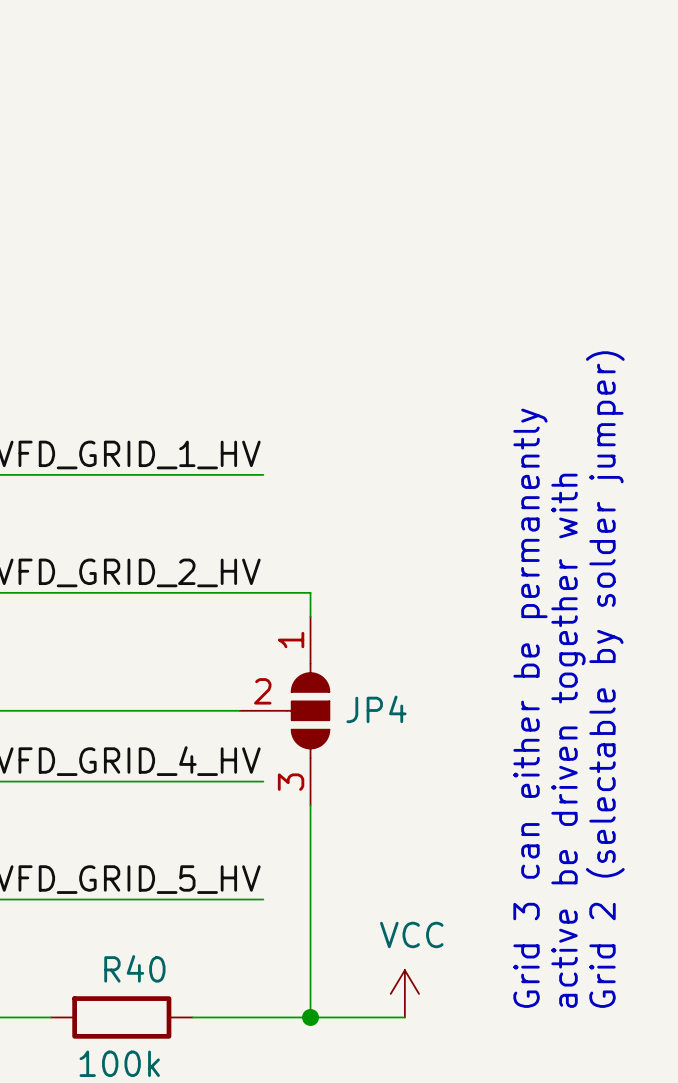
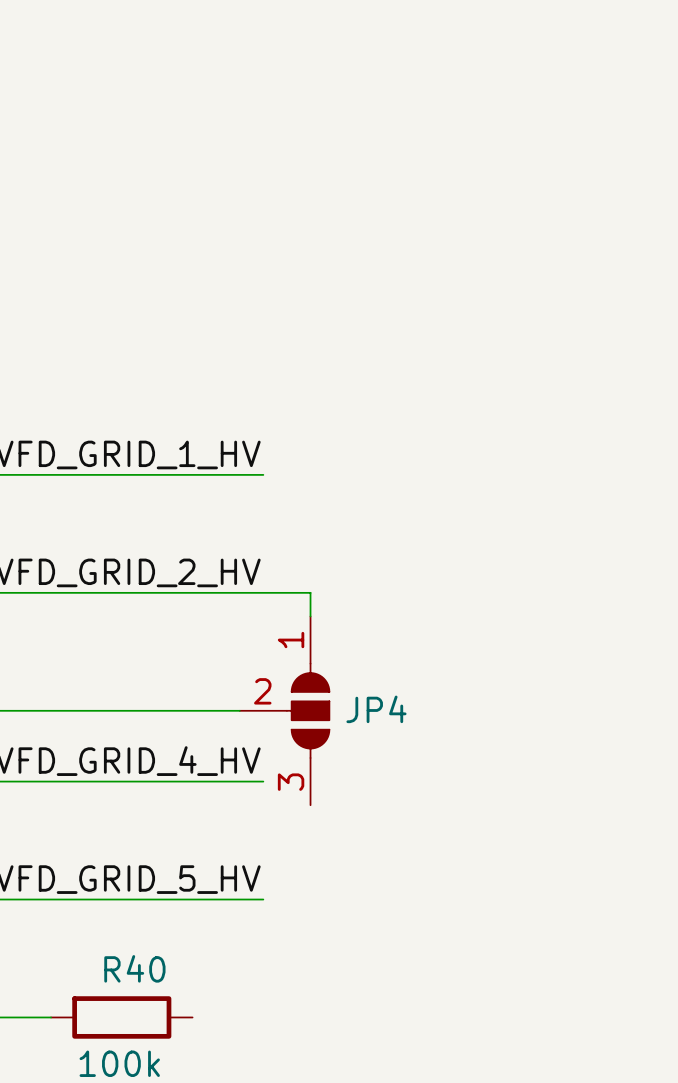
text: Grid 2 (selectable by solder jumper) (605, 679) -> none
text: Grid 3 can either be permanently (530, 708) -> none
text: active be driven together with (568, 740) -> none
wire: (310, 805) (310, 1017) -> none
power symbol: VCC (404, 993) -> none
wire: (192, 1017) (404, 1017) -> none
junction: (310, 1017) -> none

